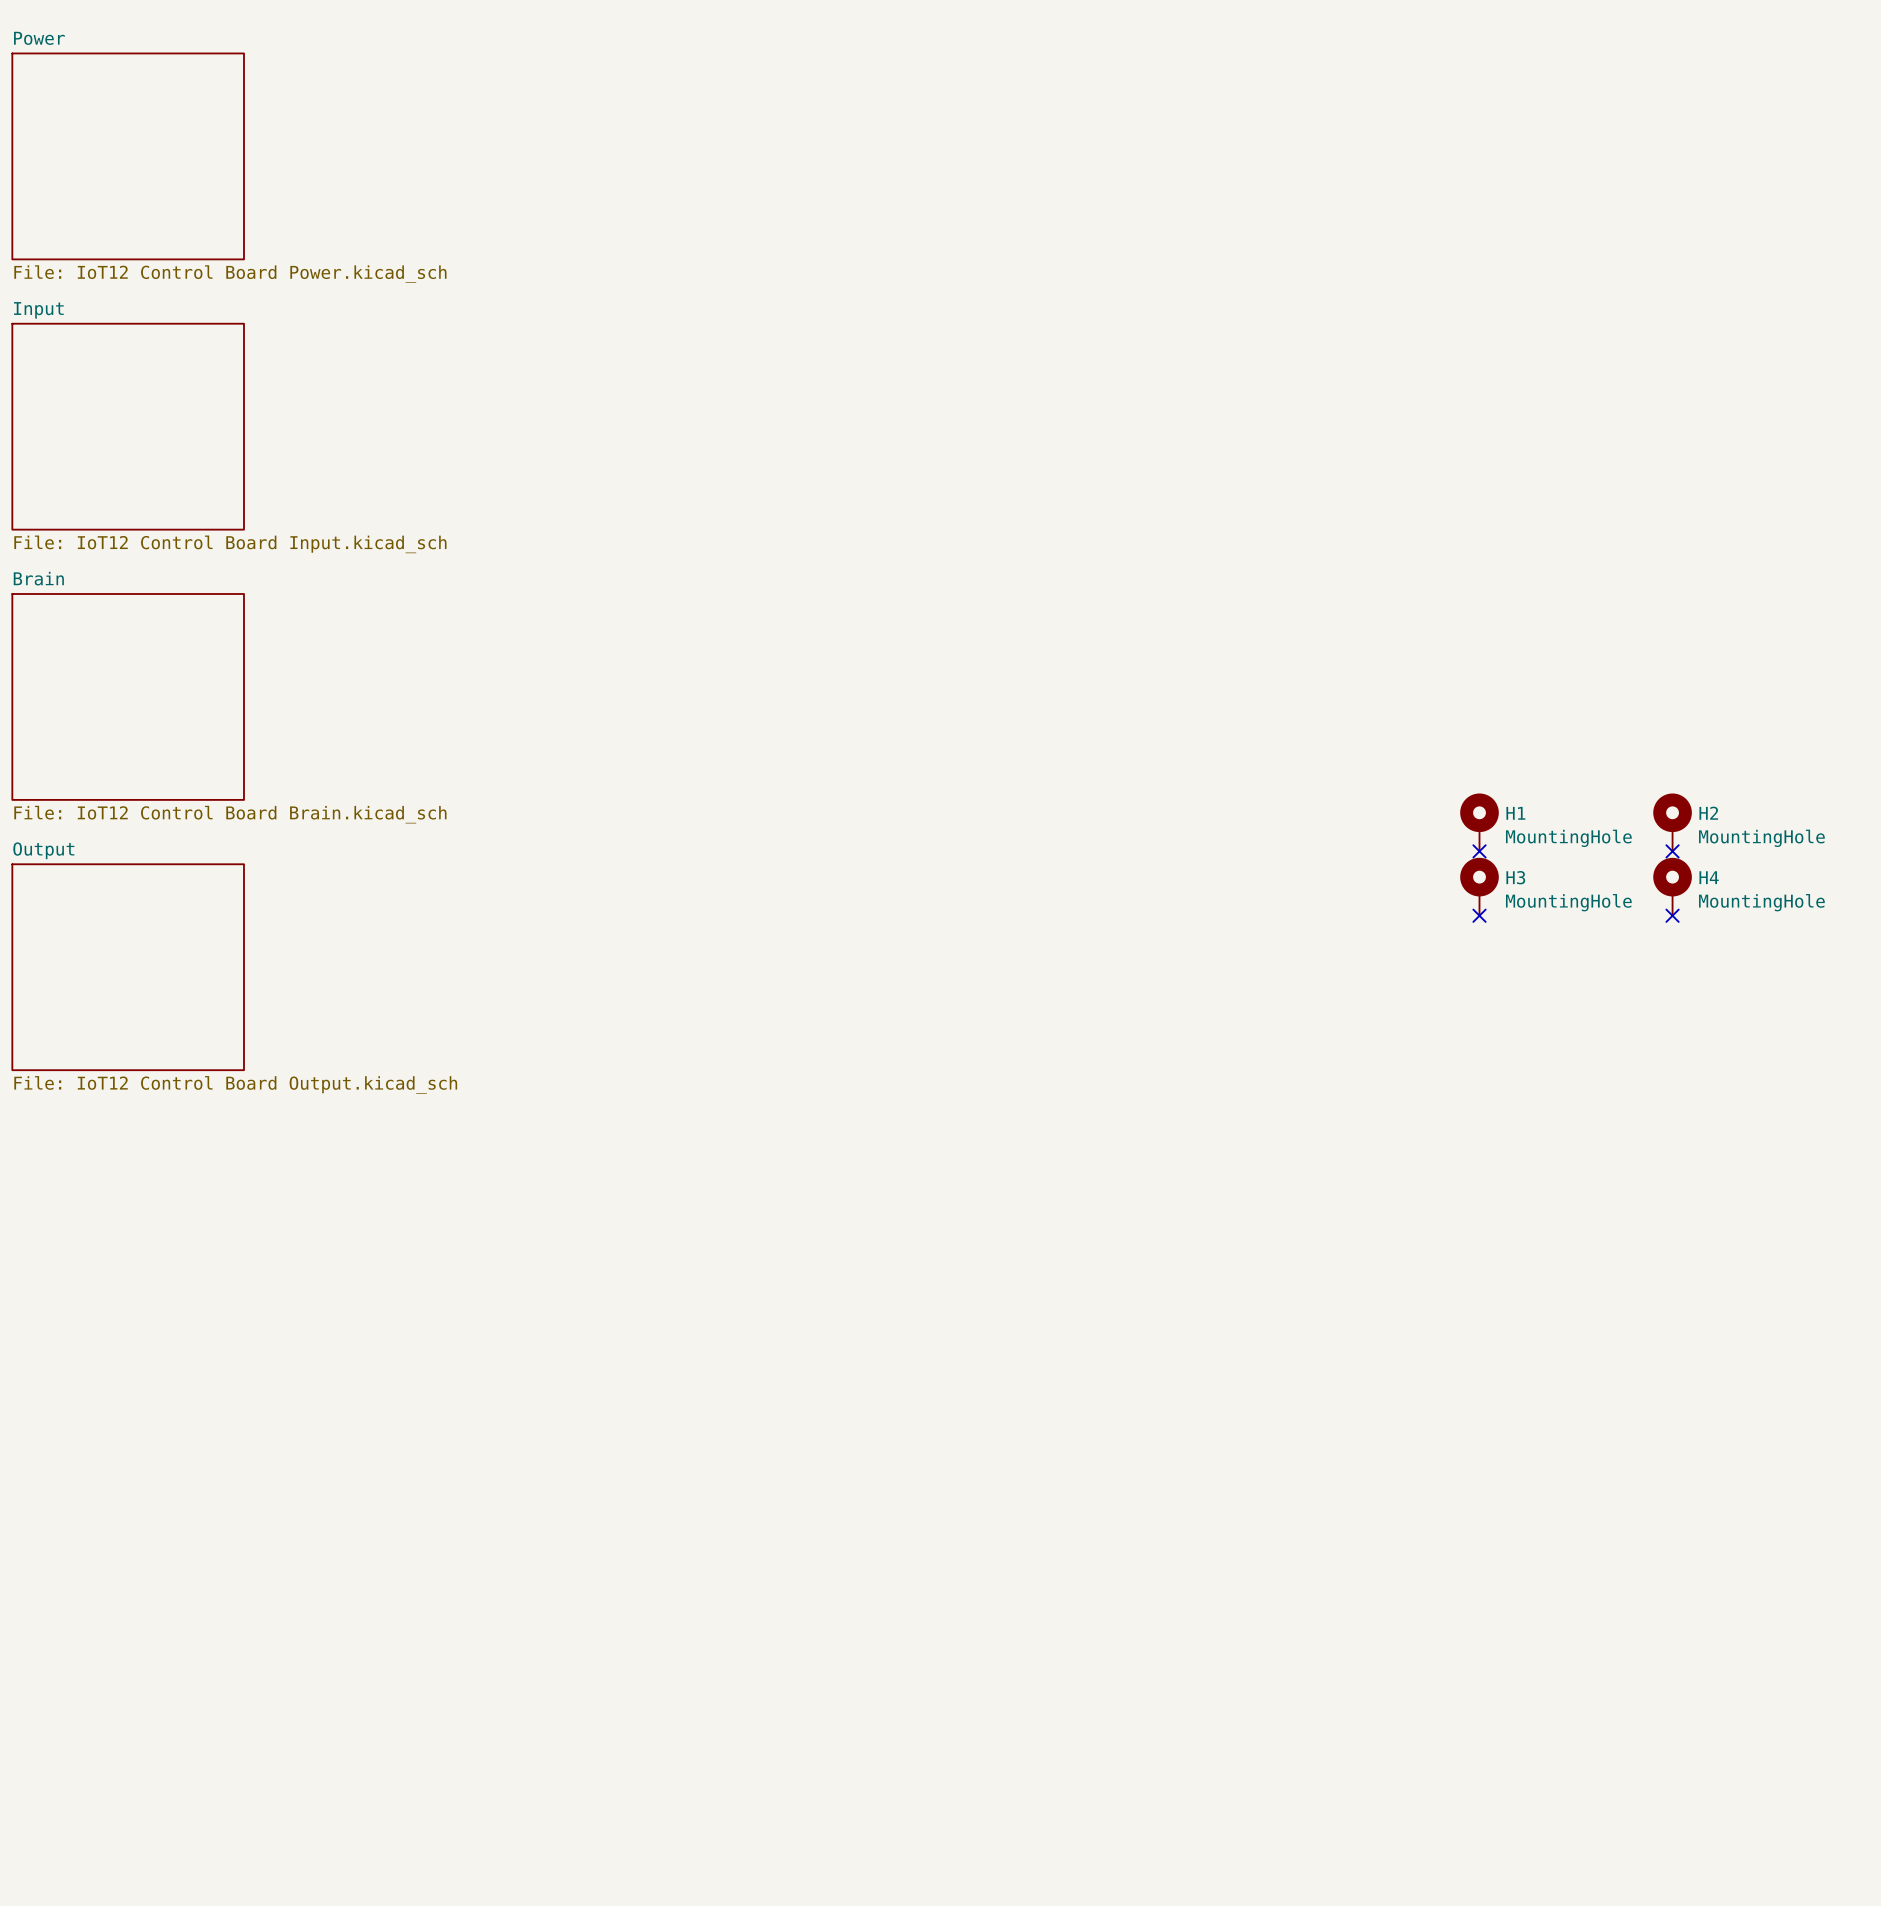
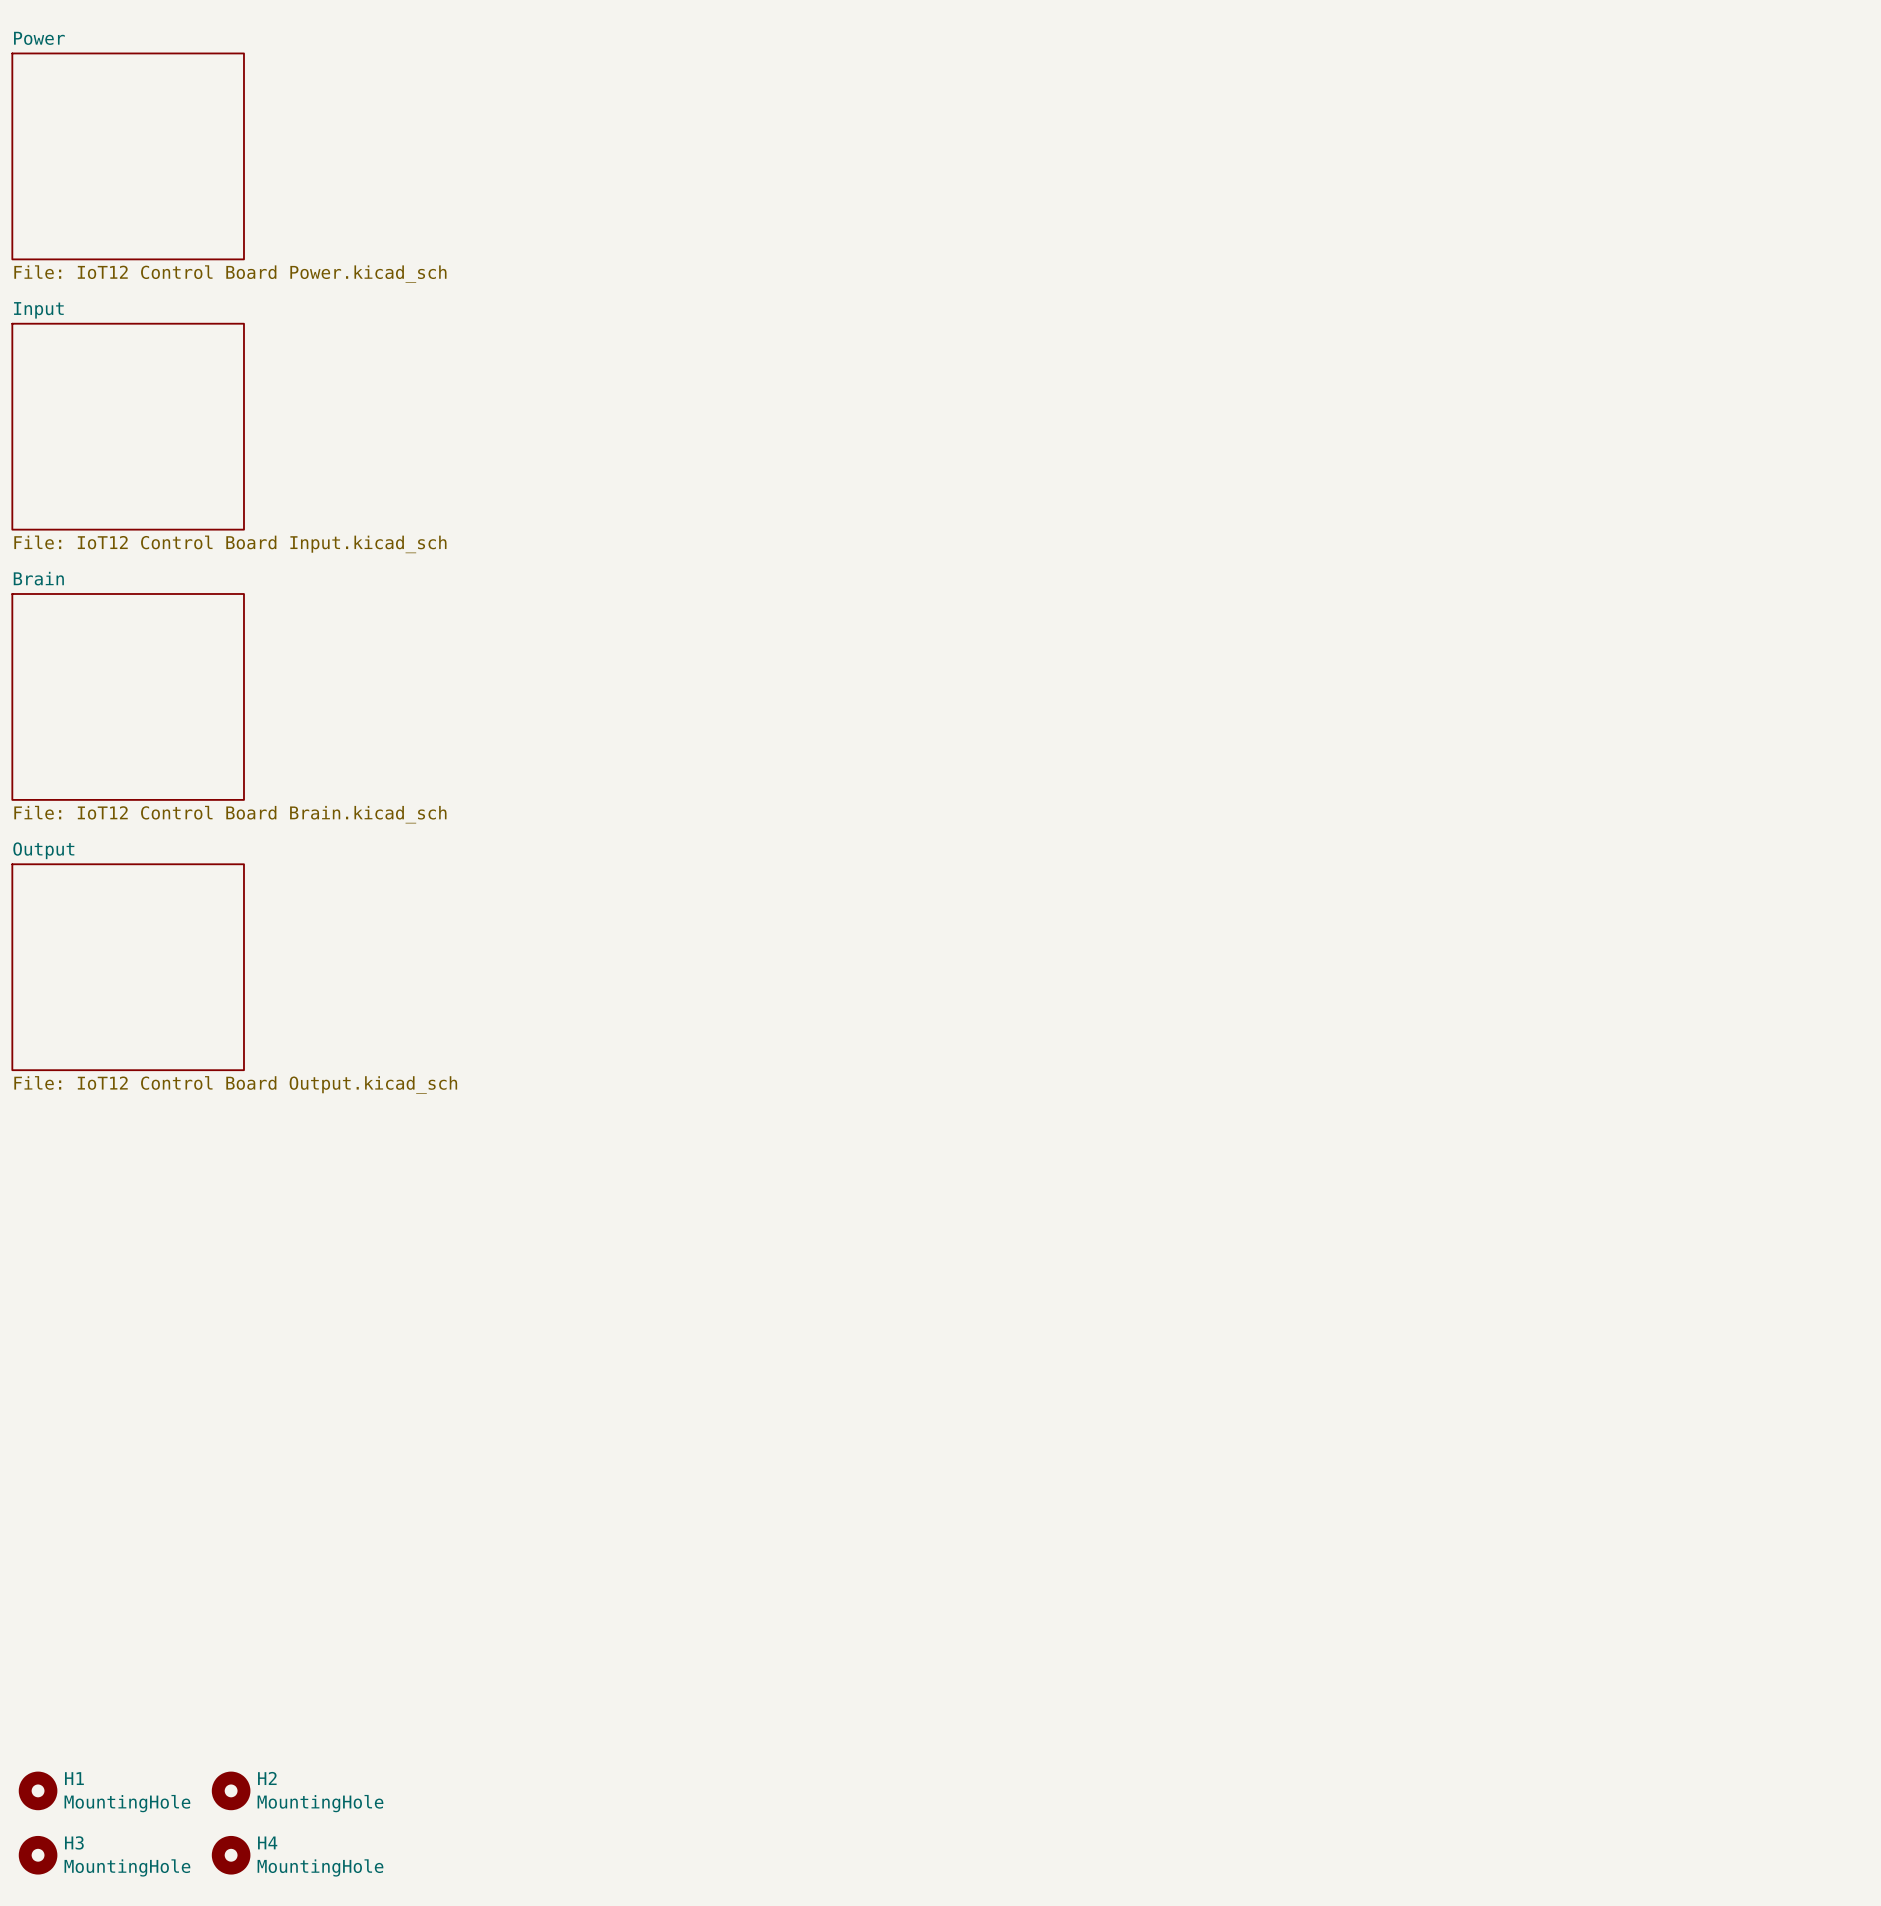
H1 symbol: [1460, 793, 1499, 852] -> [18, 1771, 58, 1811]
H2 symbol: [1653, 793, 1692, 852] -> [211, 1771, 251, 1811]
no-connect mark: (1479, 851) -> none
no-connect mark: (1672, 851) -> none
H3 symbol: [1460, 857, 1499, 916] -> [18, 1835, 58, 1875]
H4 symbol: [1653, 857, 1692, 916] -> [211, 1835, 251, 1875]
no-connect mark: (1479, 915) -> none
no-connect mark: (1672, 915) -> none

